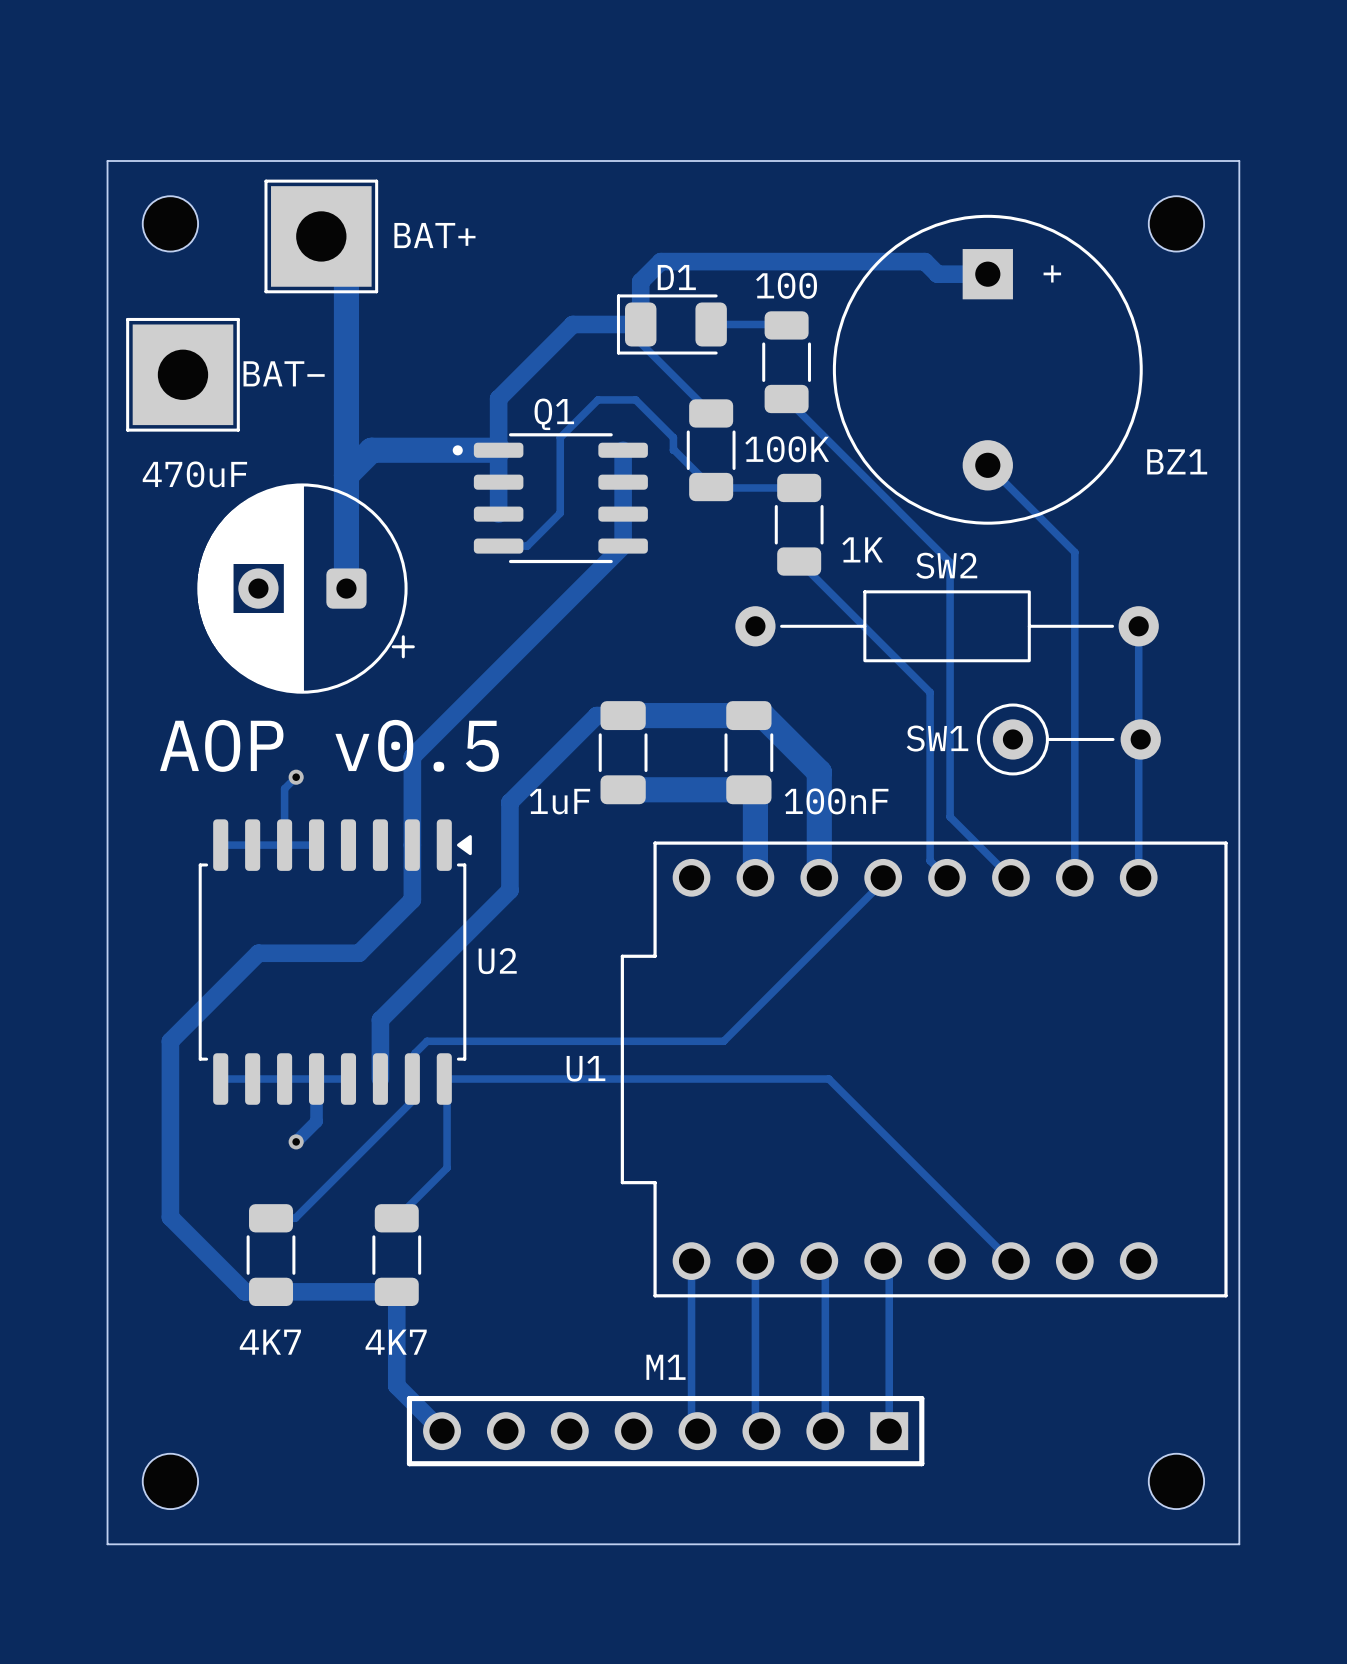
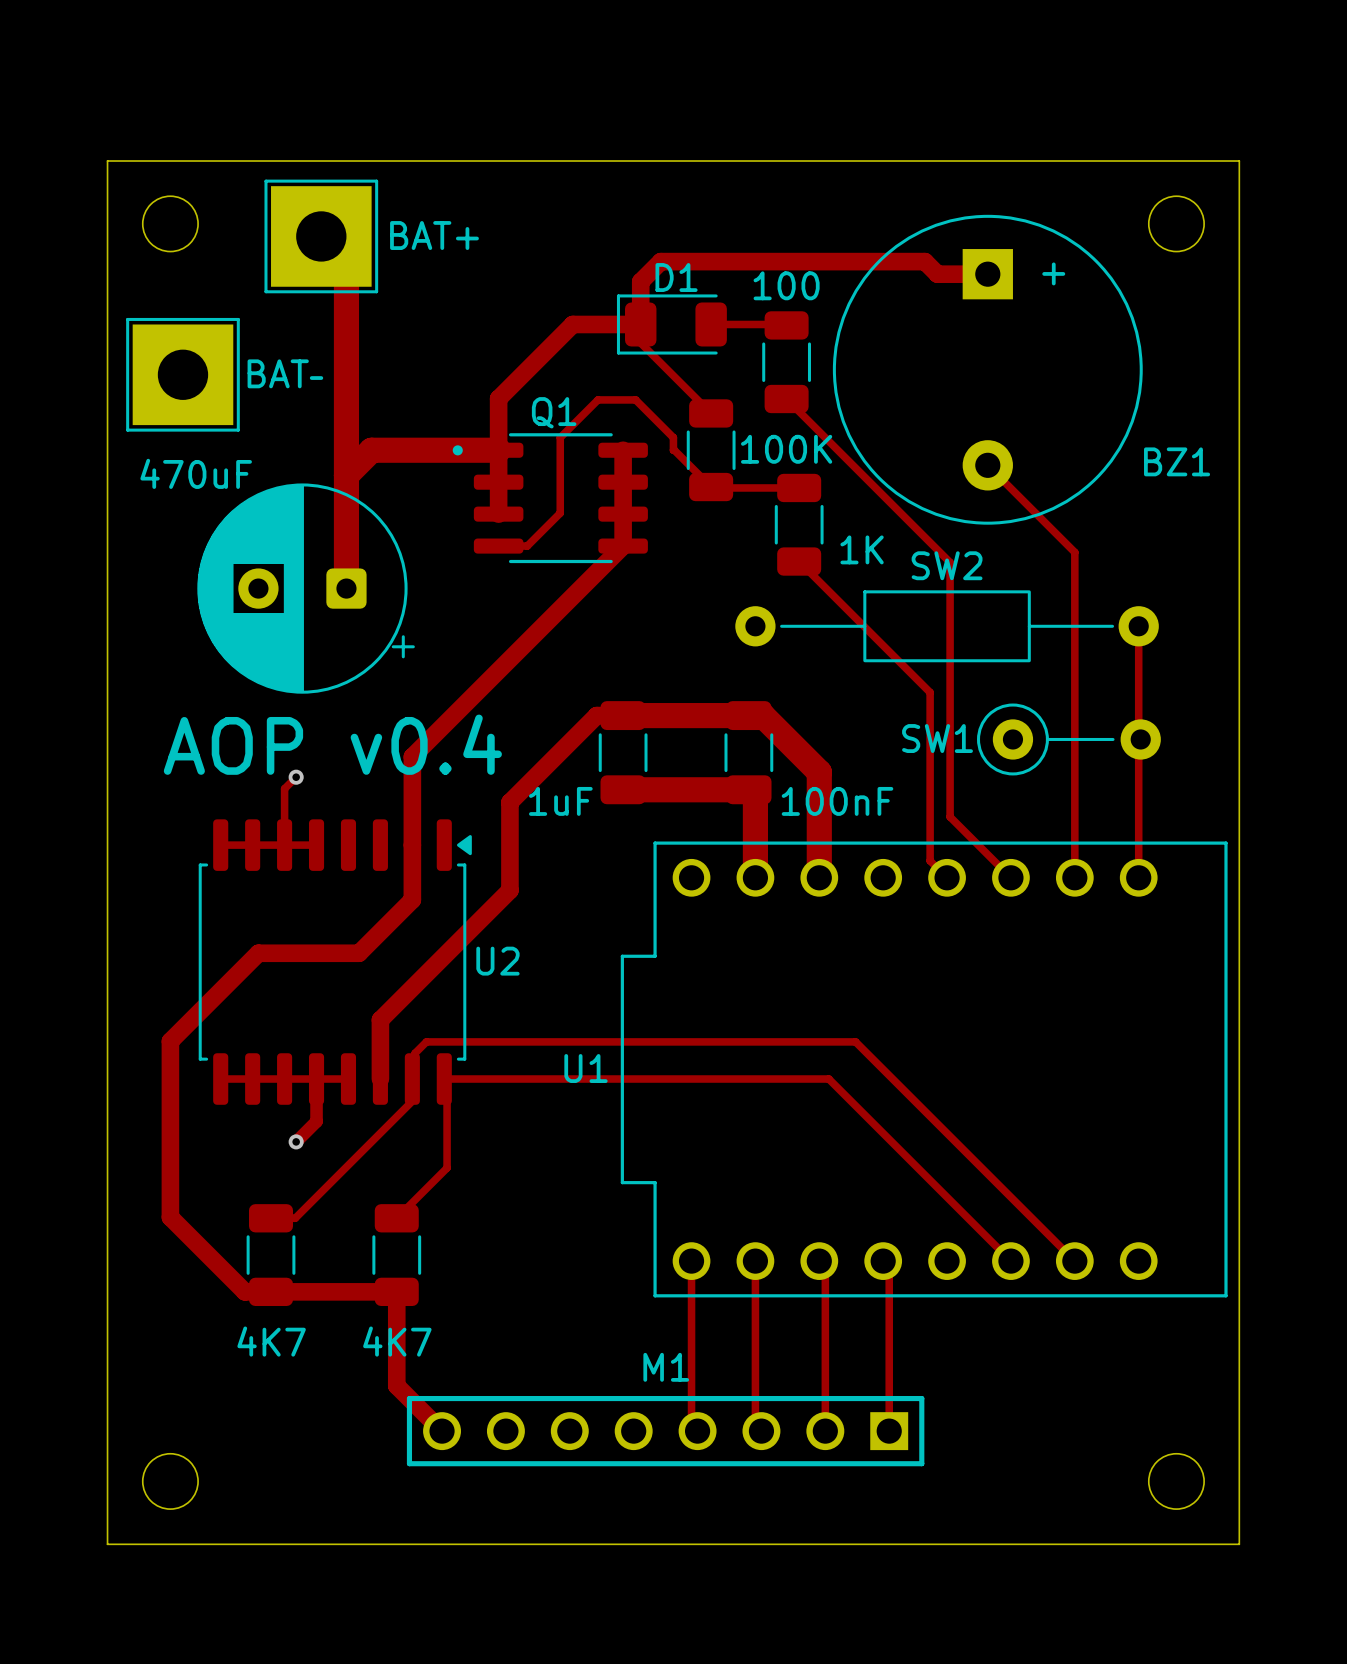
text: AOP v0.5 (329, 745) -> AOP v0.4 (332, 744)
track: (883, 877) (883, 881) (723, 1041) (426, 1041) -> (1074, 1261) (855, 1041) (426, 1041)

